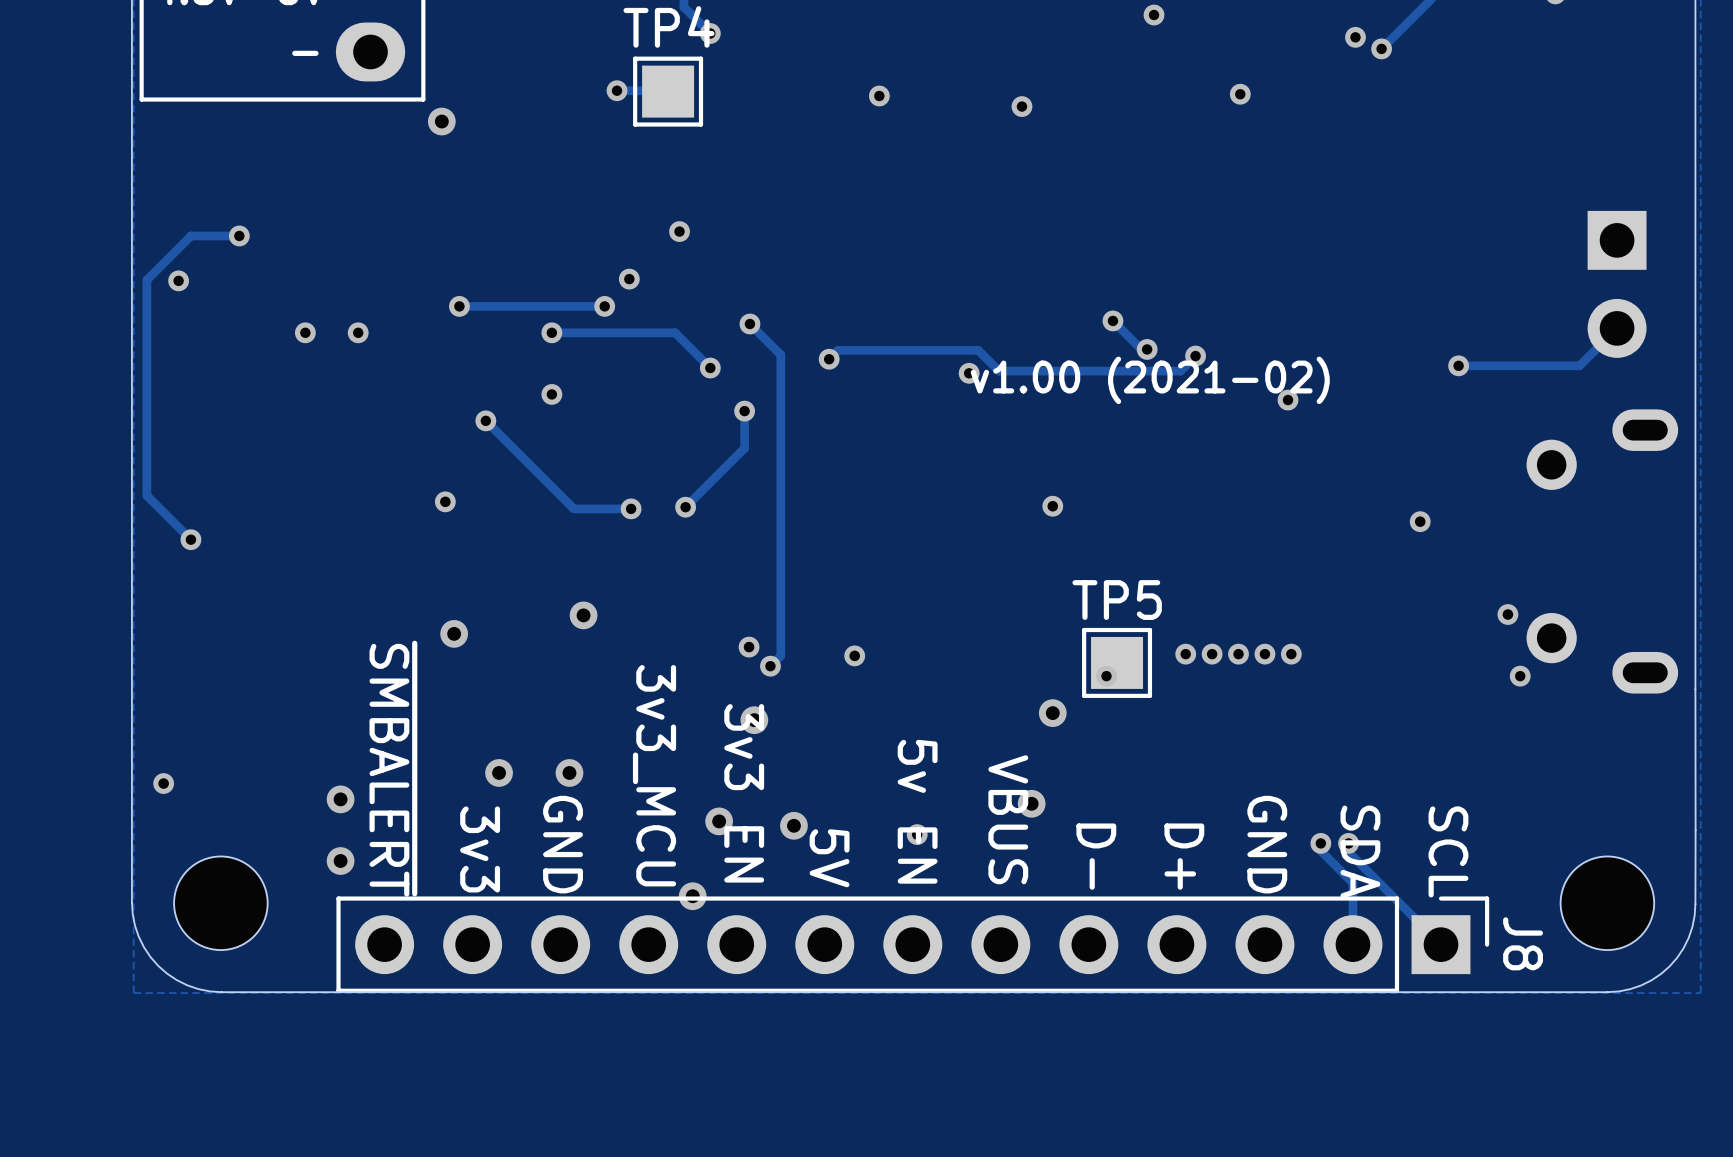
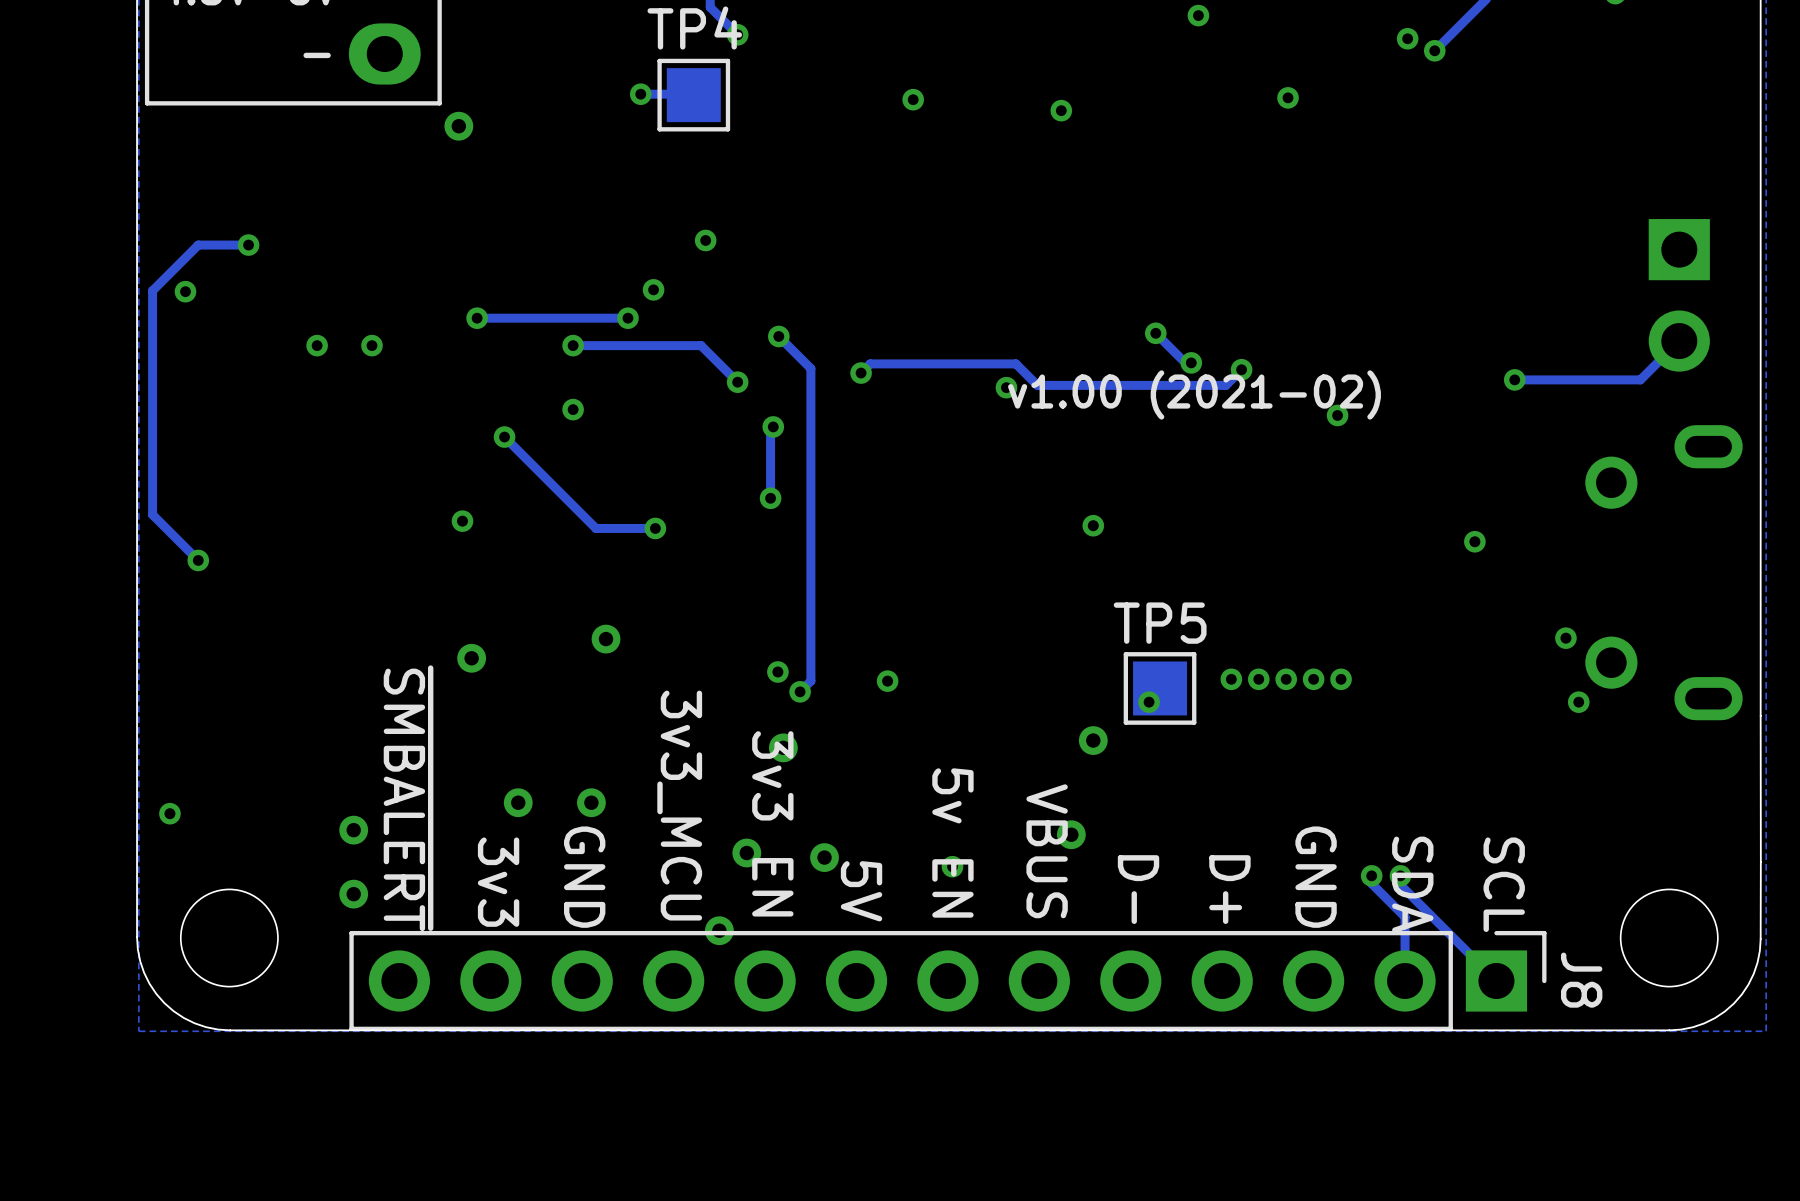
track: (744, 411) (744, 448) (685, 507) -> none
track: none -> (770, 429) (770, 498)
via position: (685, 507) -> (770, 498)

